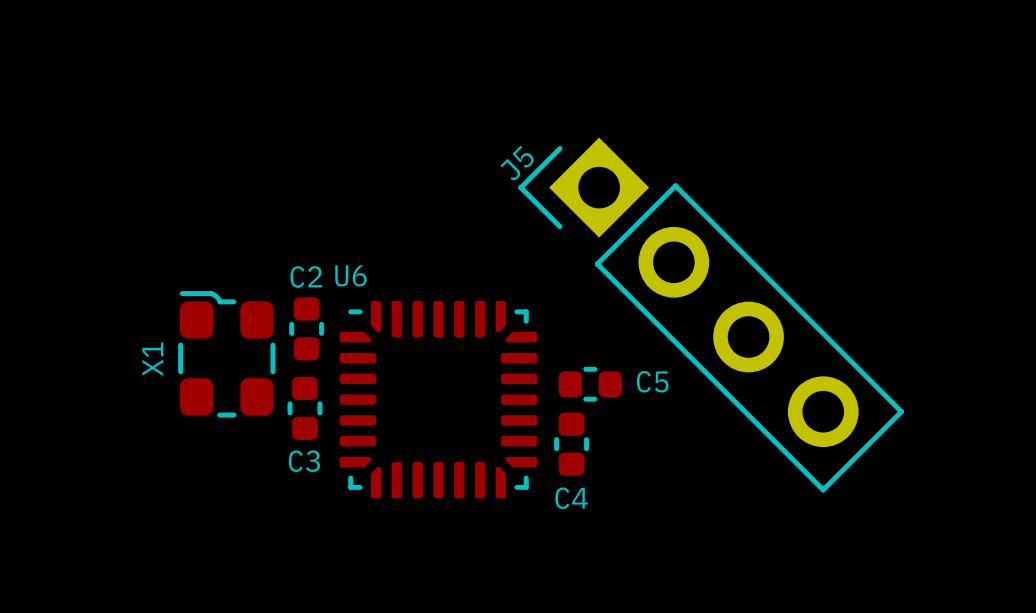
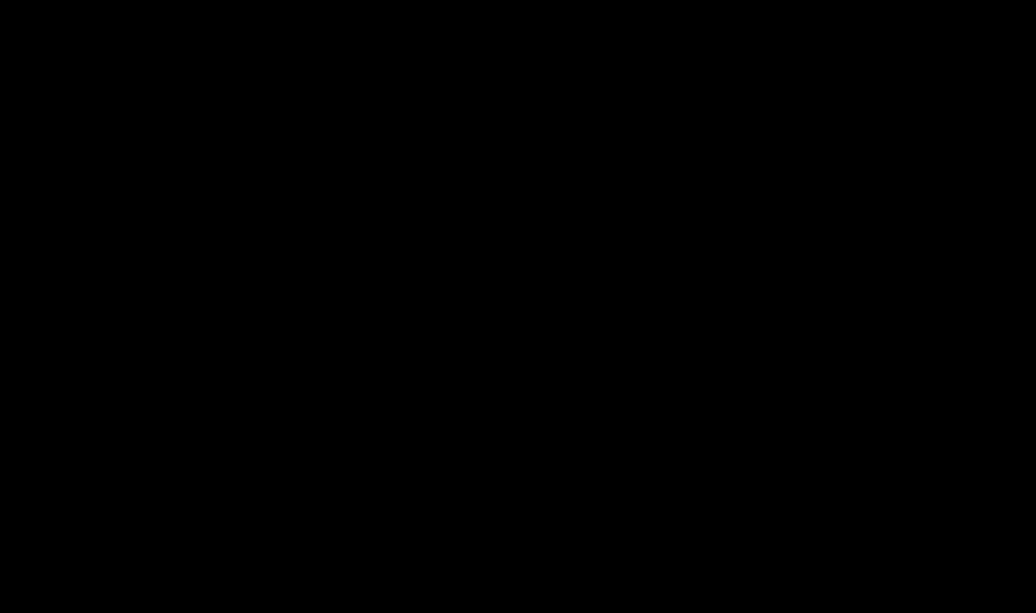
J5: (711, 315) -> none
C2: (306, 328) -> none
X1: (226, 354) -> none
C5: (590, 384) -> none
U6: (438, 399) -> none
C3: (304, 408) -> none
C4: (571, 444) -> none

